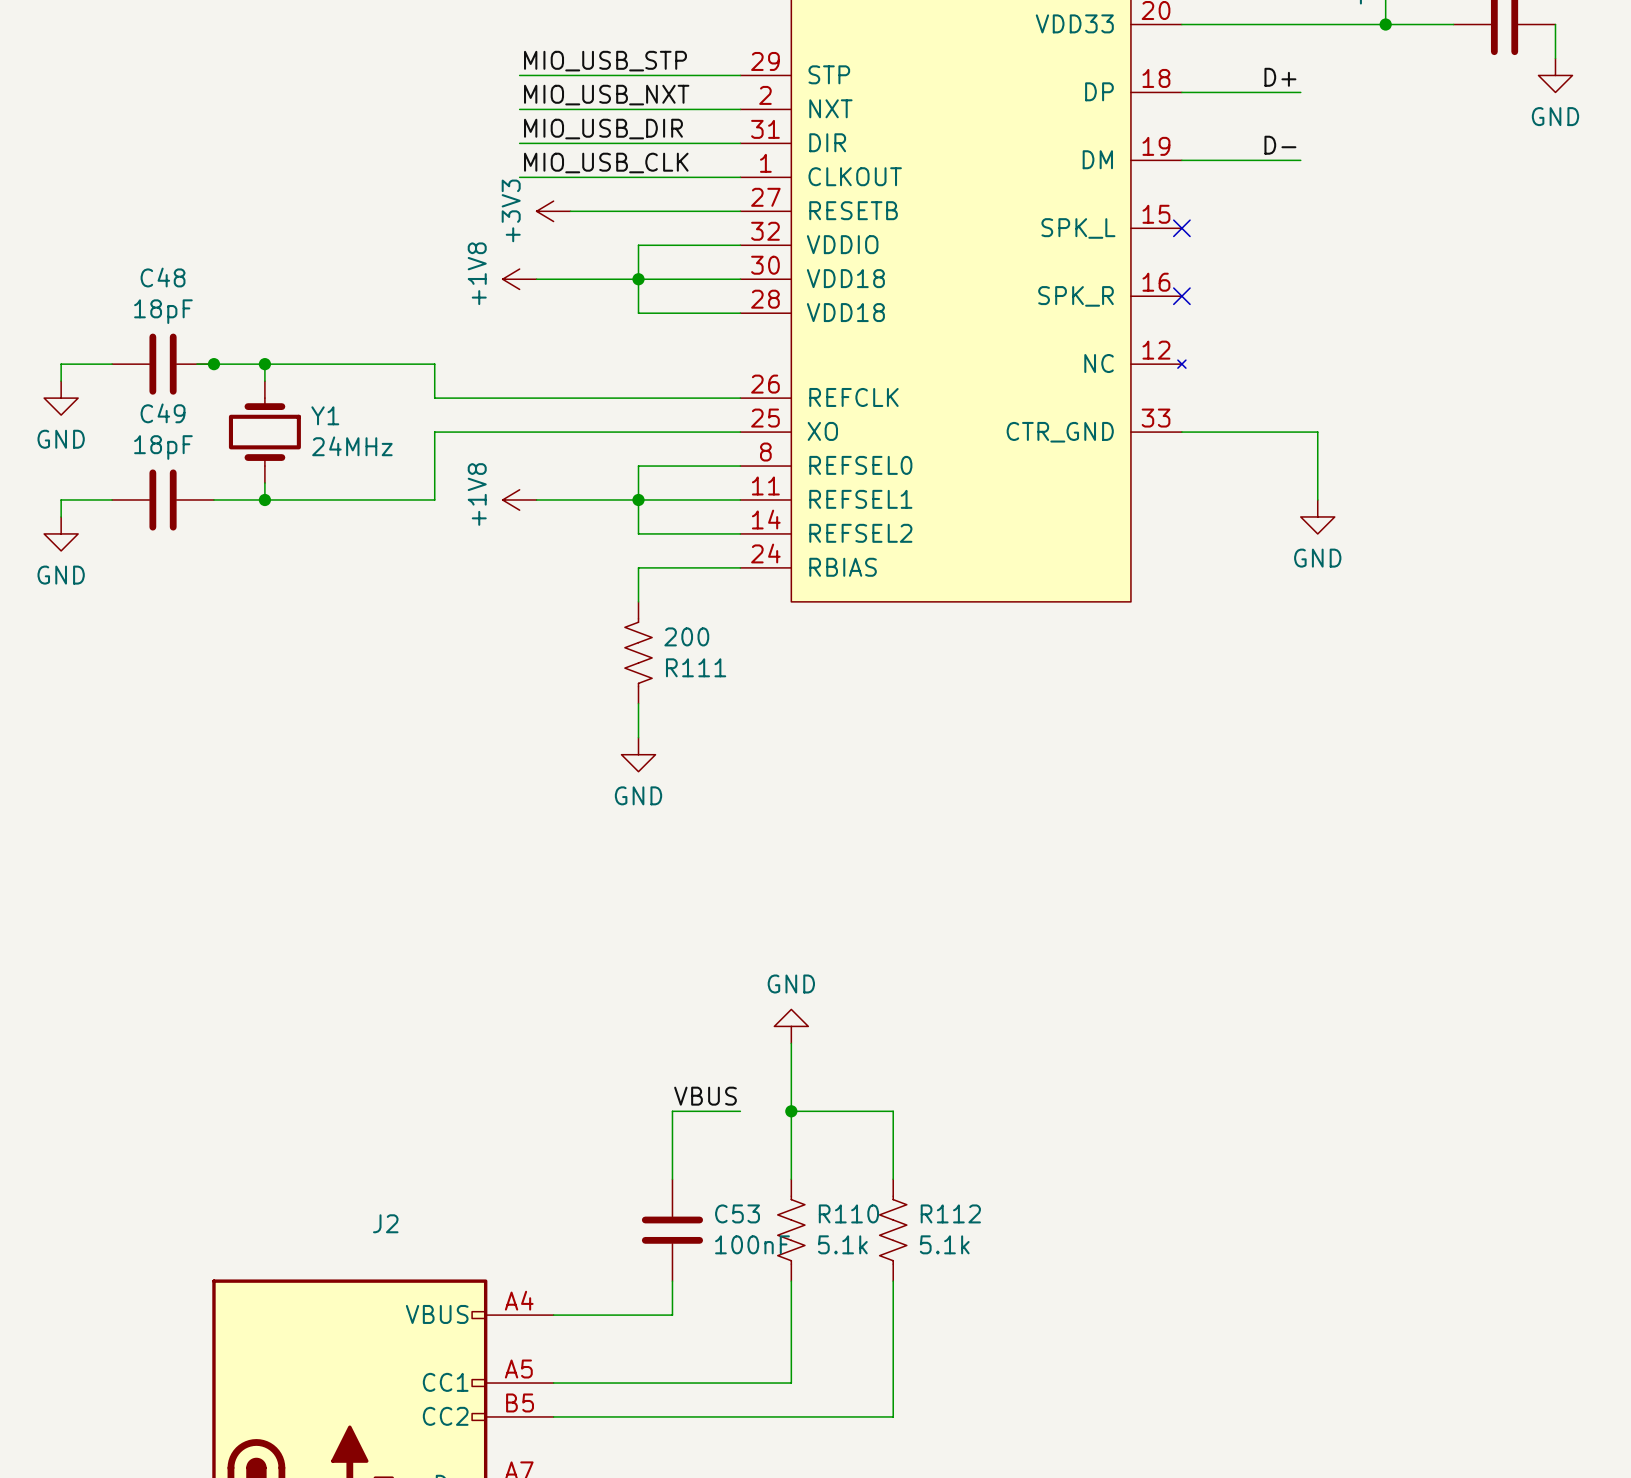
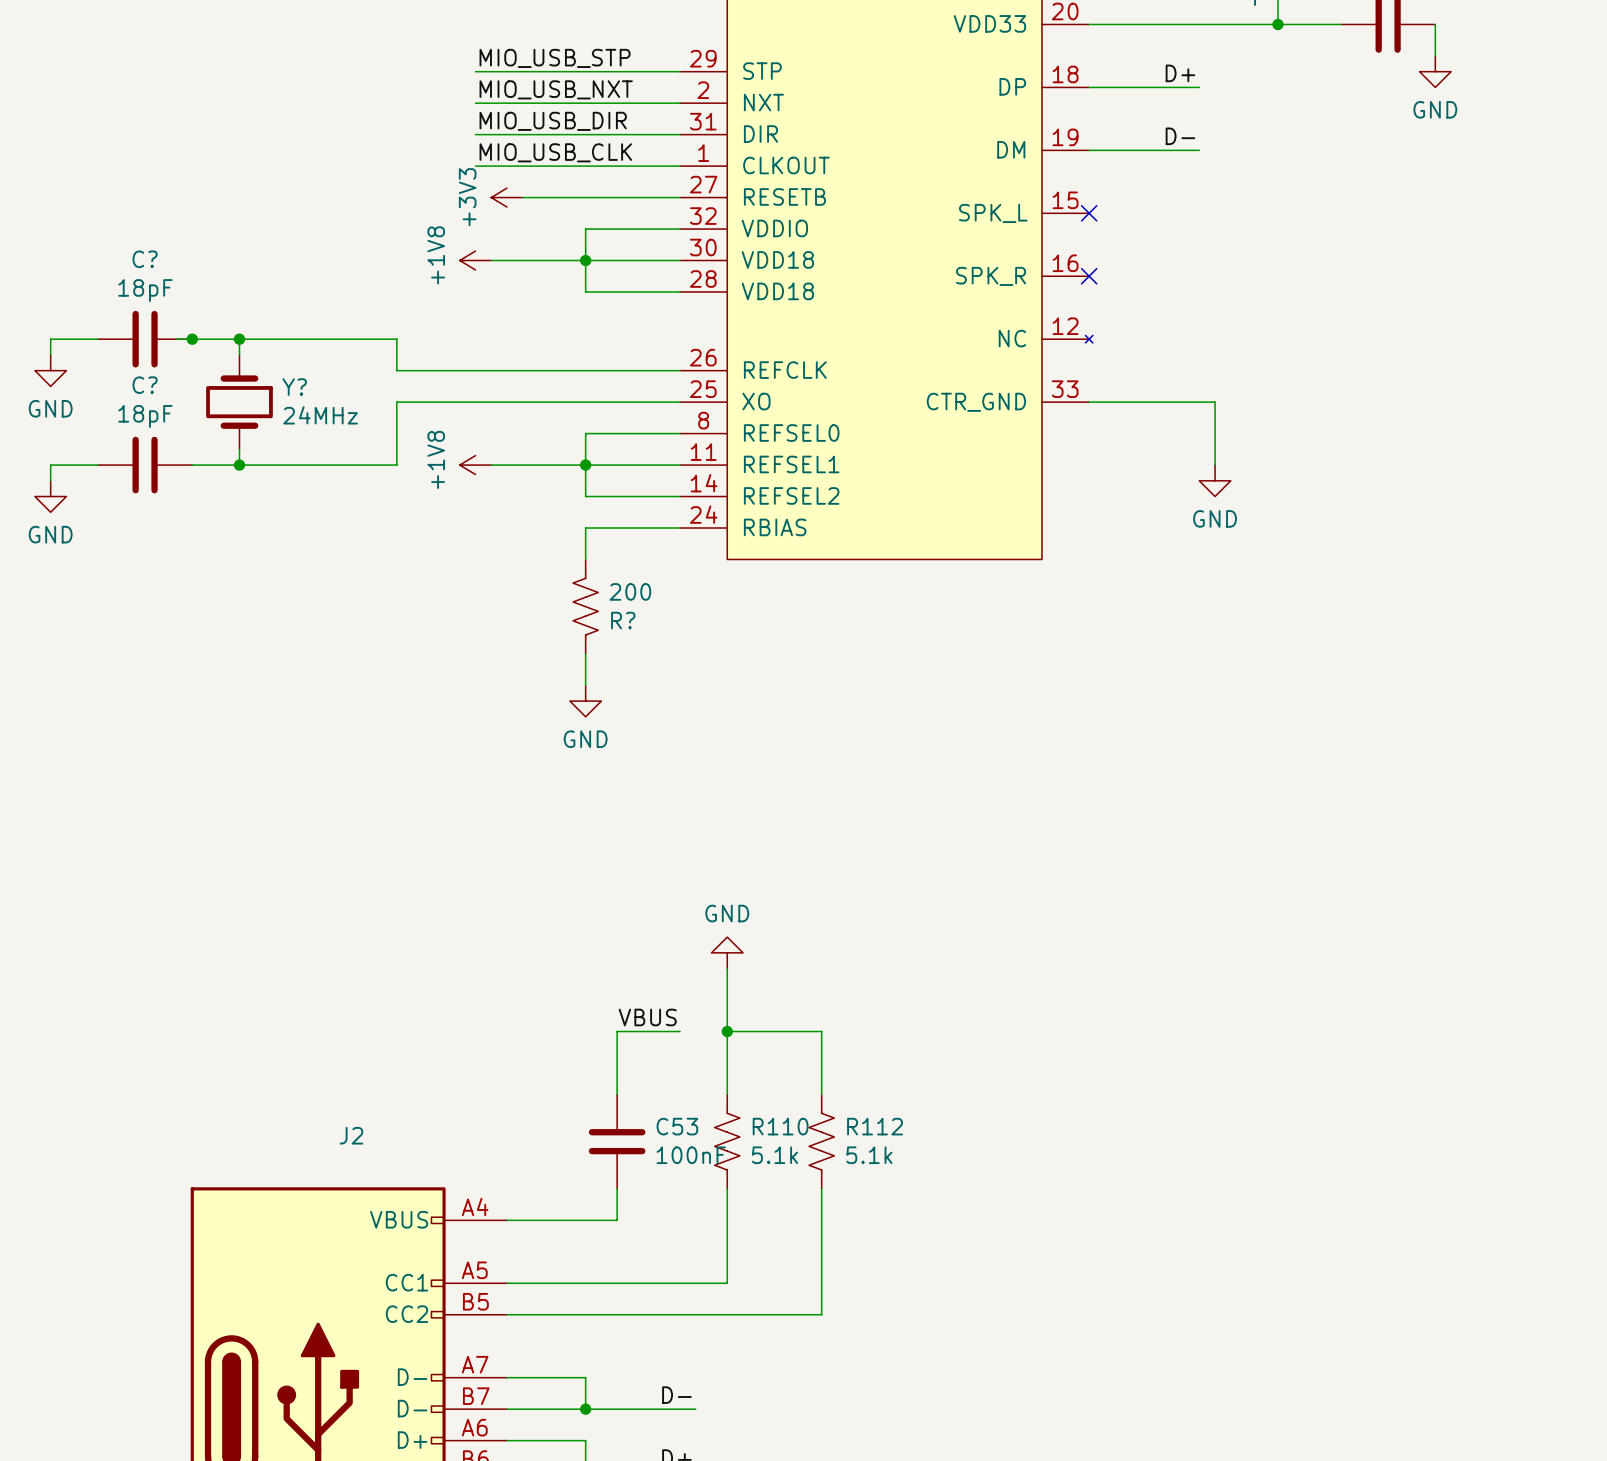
C48 name: C48 (163, 277) -> C? (145, 259)
C49 name: C49 (163, 413) -> C? (145, 385)
Y1 name: Y1 (325, 415) -> Y? (294, 387)
R111 name: R111 (696, 667) -> R? (623, 620)

